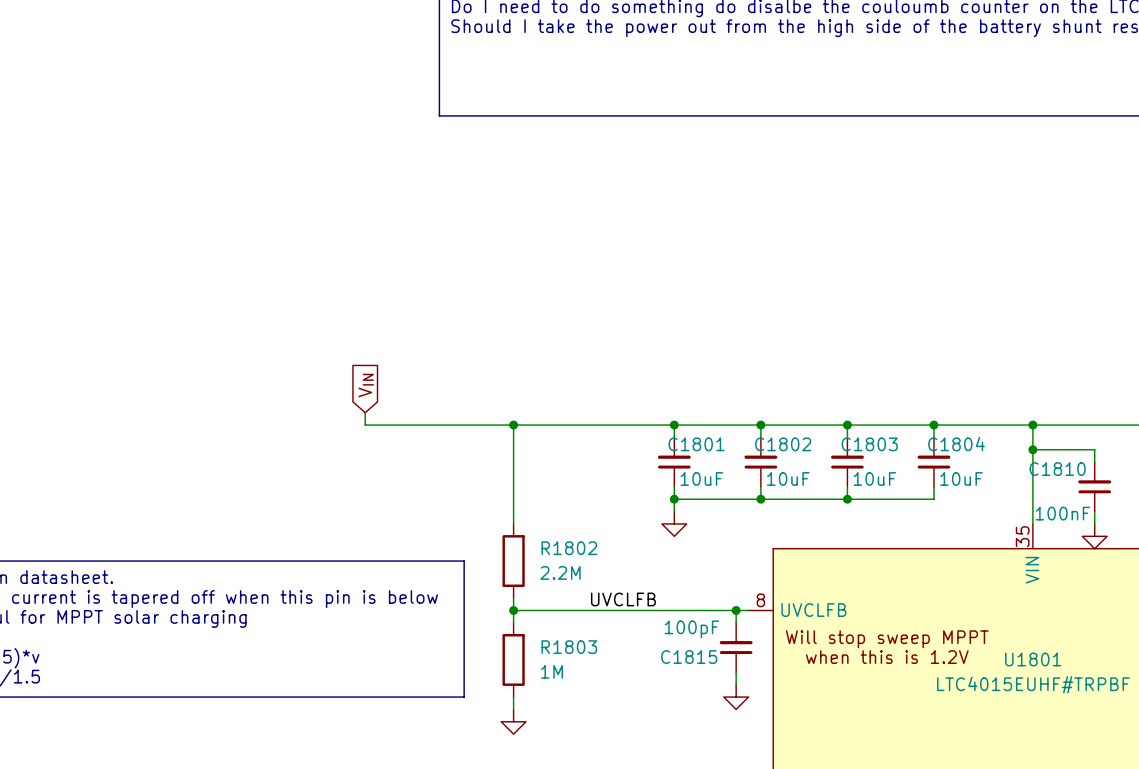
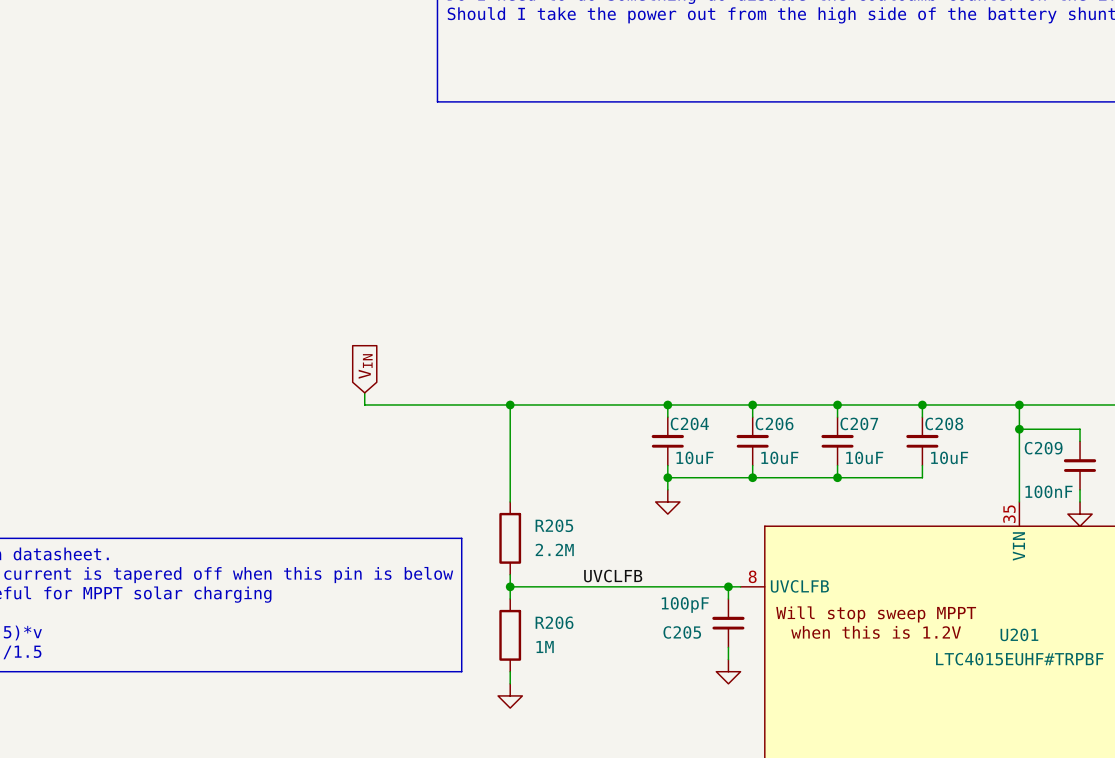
C1801 name: C1801 (696, 444) -> C204 (689, 423)
C1802 name: C1802 (783, 444) -> C206 (774, 423)
C1803 name: C1803 (869, 444) -> C207 (859, 423)
C1804 name: C1804 (956, 444) -> C208 (944, 423)
C1810 name: C1810 (1057, 469) -> C209 (1043, 448)
R1802 name: R1802 (569, 548) -> R205 (554, 525)
R1803 name: R1803 (569, 647) -> R206 (554, 622)
C1815 name: C1815 (689, 657) -> C205 (682, 632)
U1801 name: U1801 (1033, 659) -> U201 (1019, 634)

